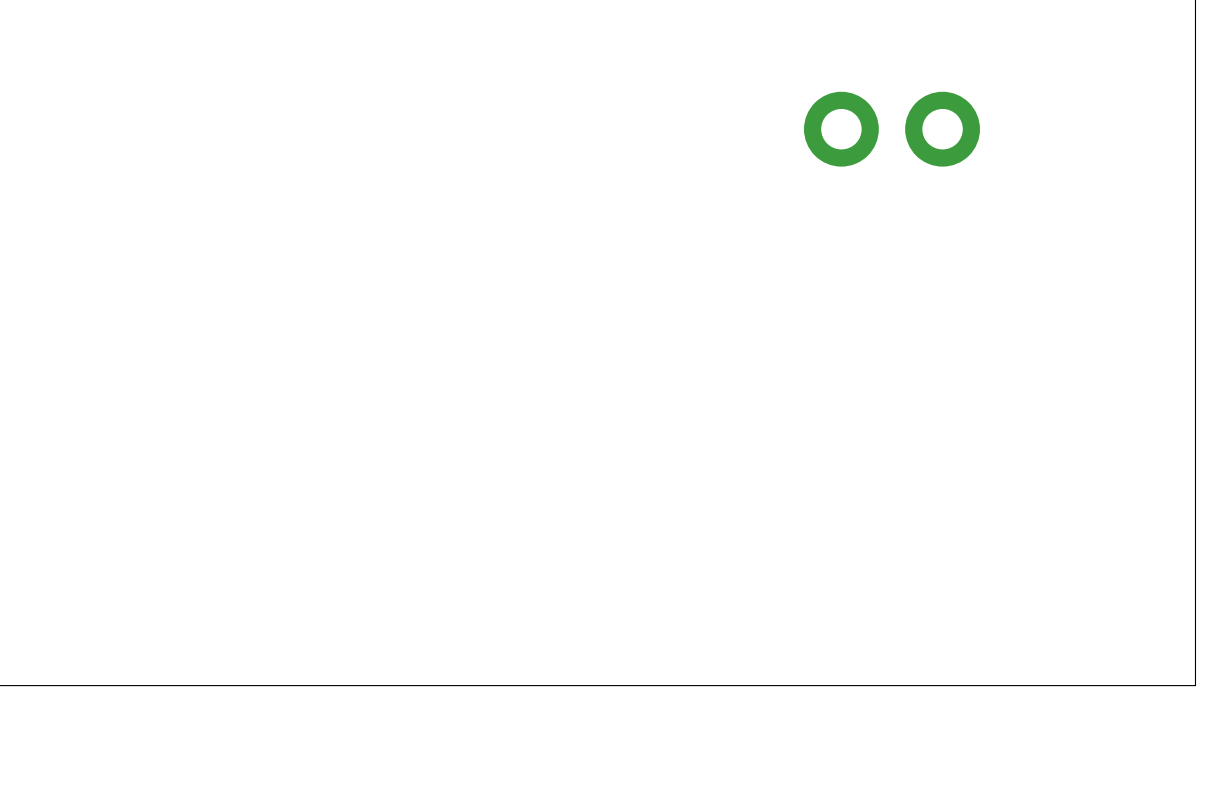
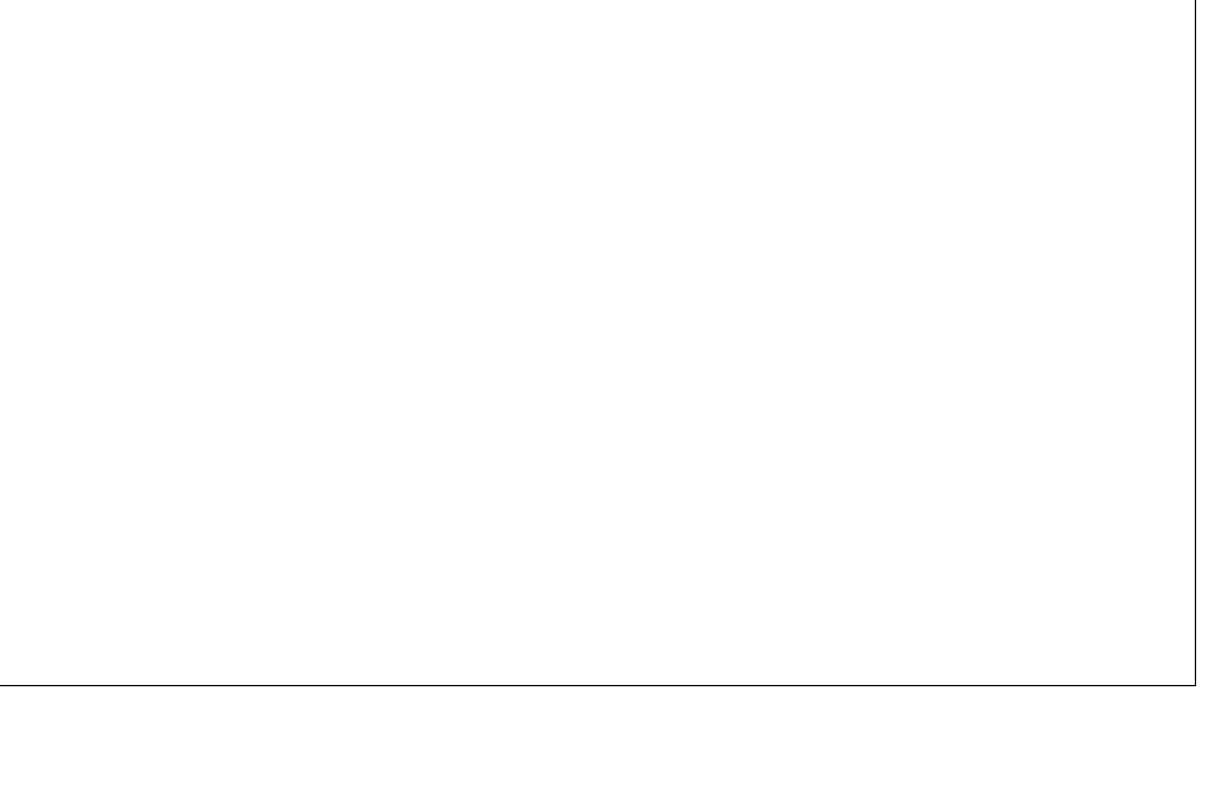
part: (891, 129) -> none

